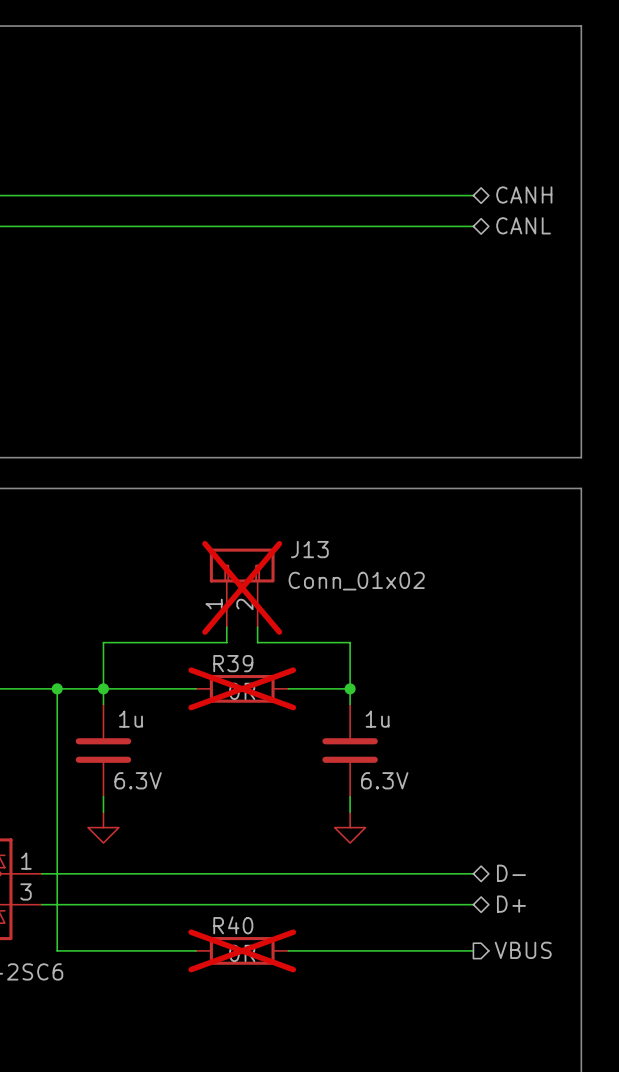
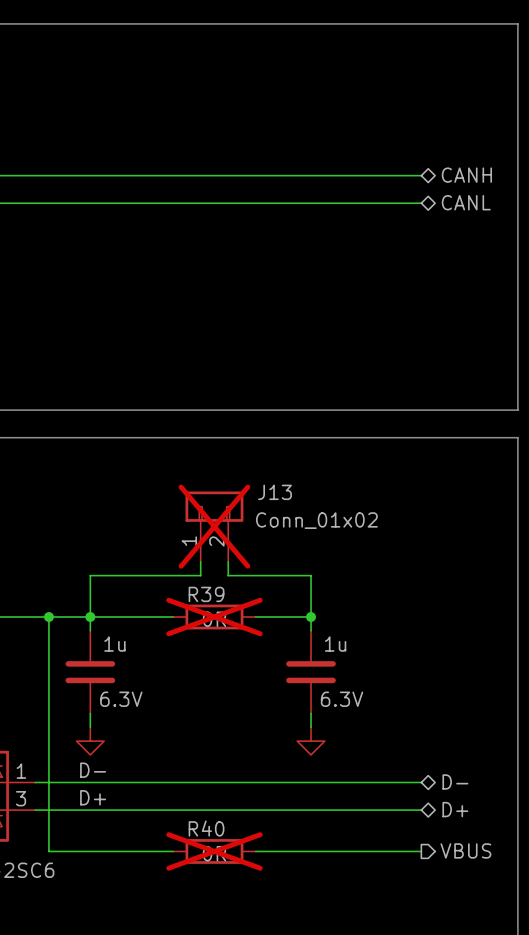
label: none -> D- (93, 770)
label: none -> D+ (93, 797)

